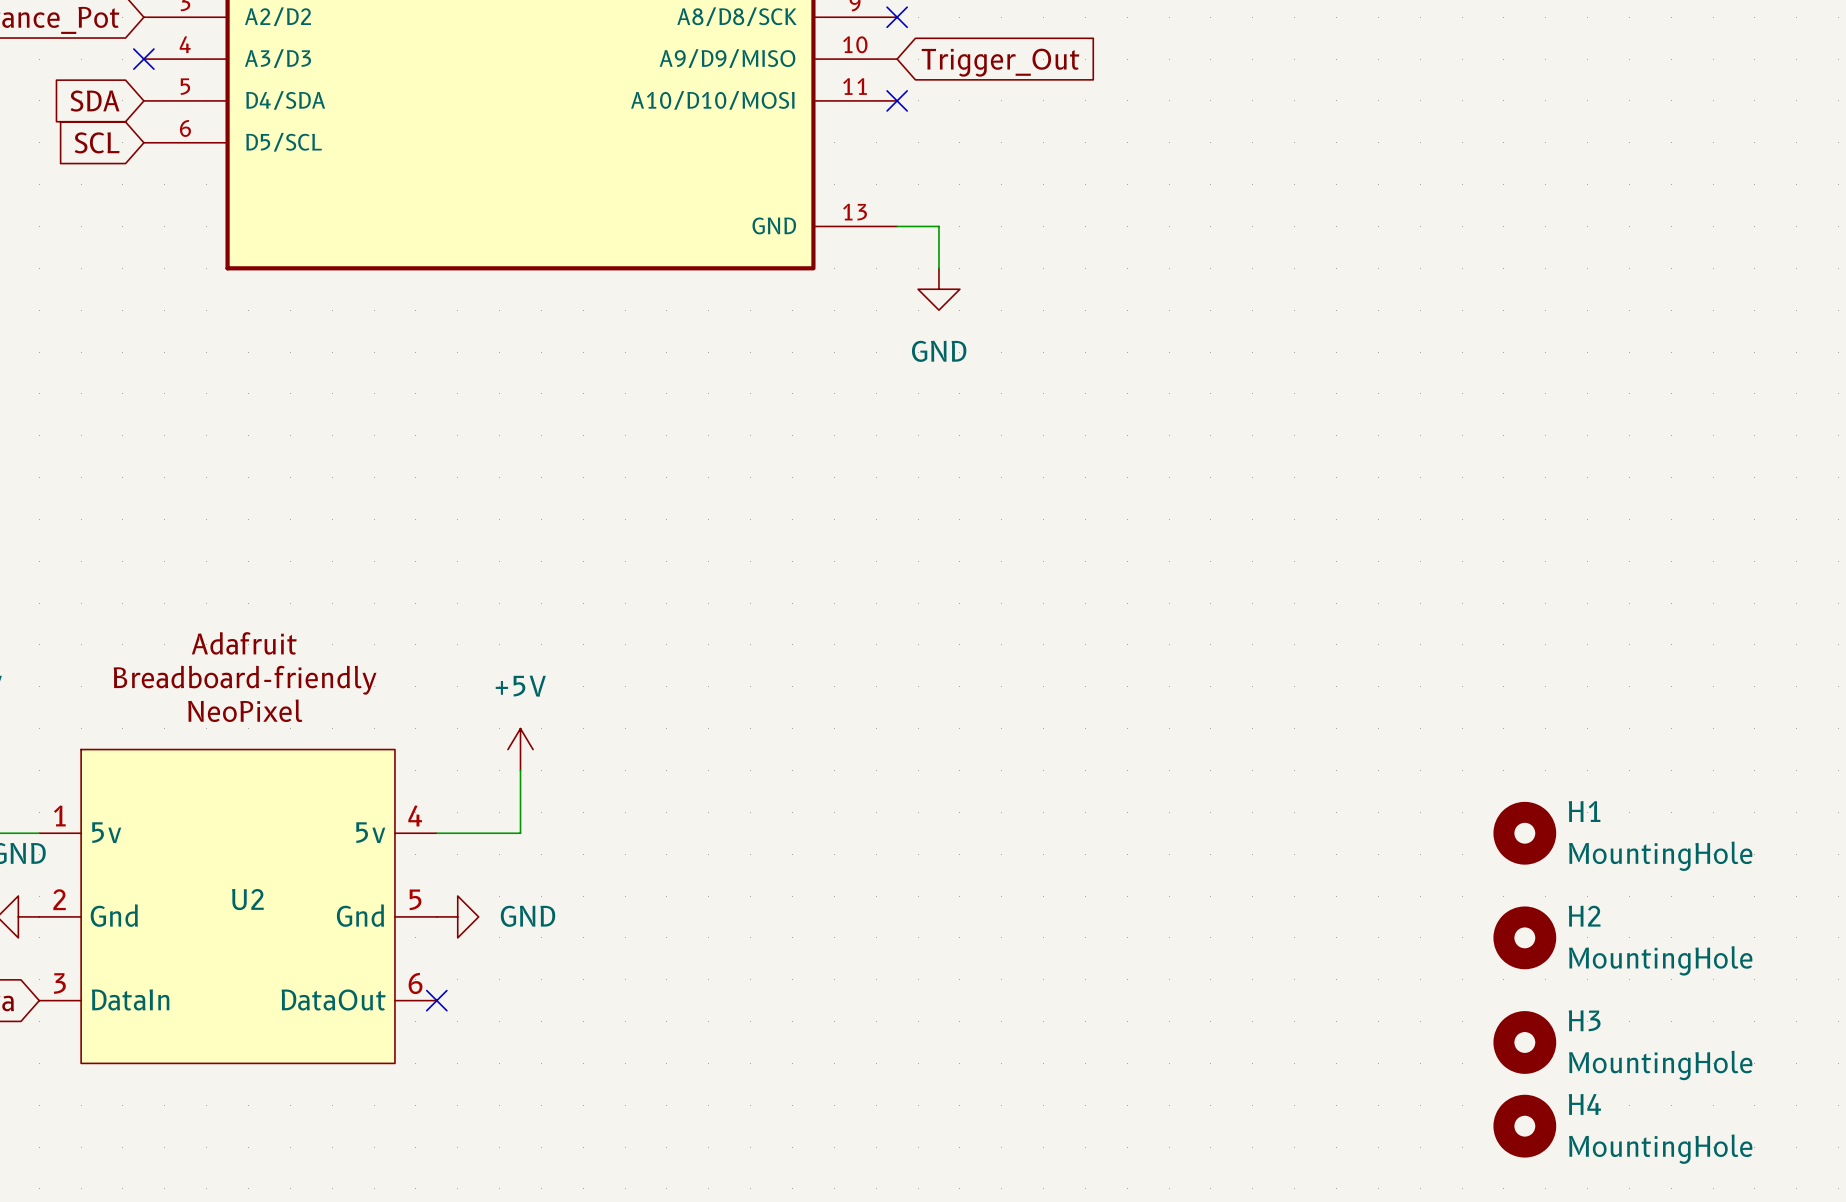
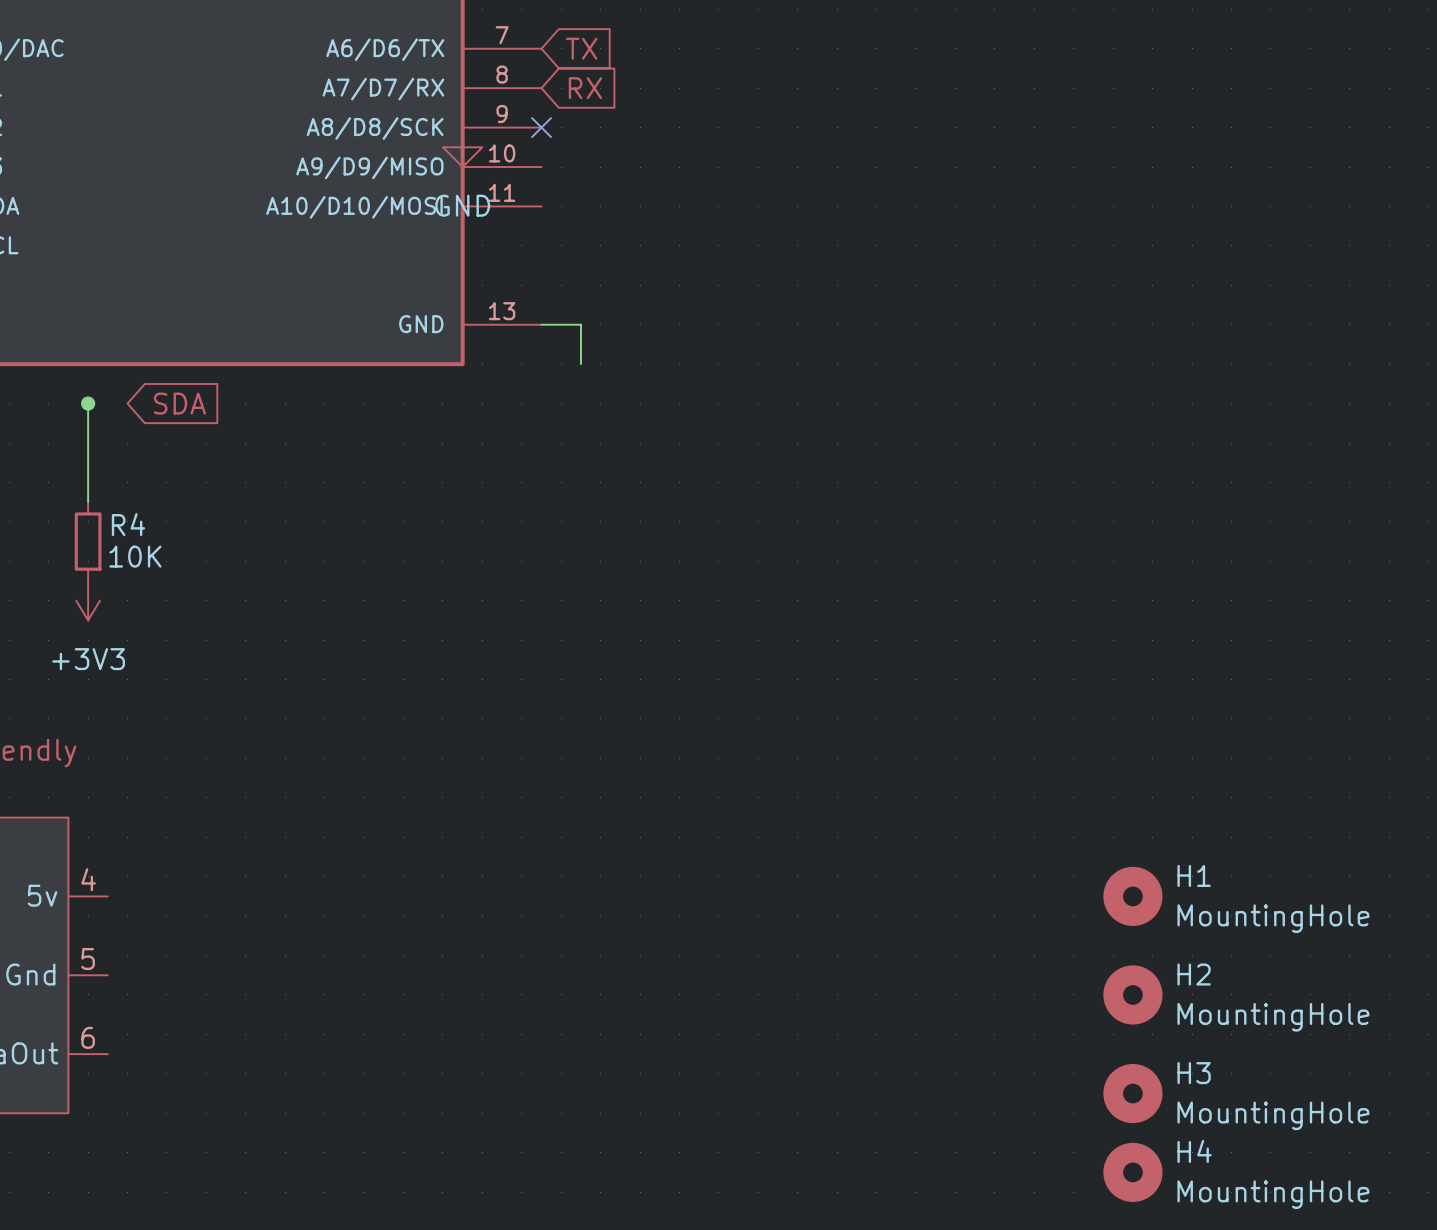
global label: Trigger_Out (1000, 62) -> none
no-connect mark: (897, 100) -> none
power symbol position: GND (938, 289) -> GND (462, 147)
wire: none -> (88, 403) (88, 502)
junction: none -> (88, 403)
global label: none -> SDA (179, 403)
R4: none -> 10K (88, 541)
power symbol: none -> +3V3 (88, 600)
power symbol: +5V (520, 749) -> none
wire: (520, 770) (520, 833) (436, 833) -> none
power symbol: GND (457, 916) -> none
no-connect mark: (436, 1000) -> none

